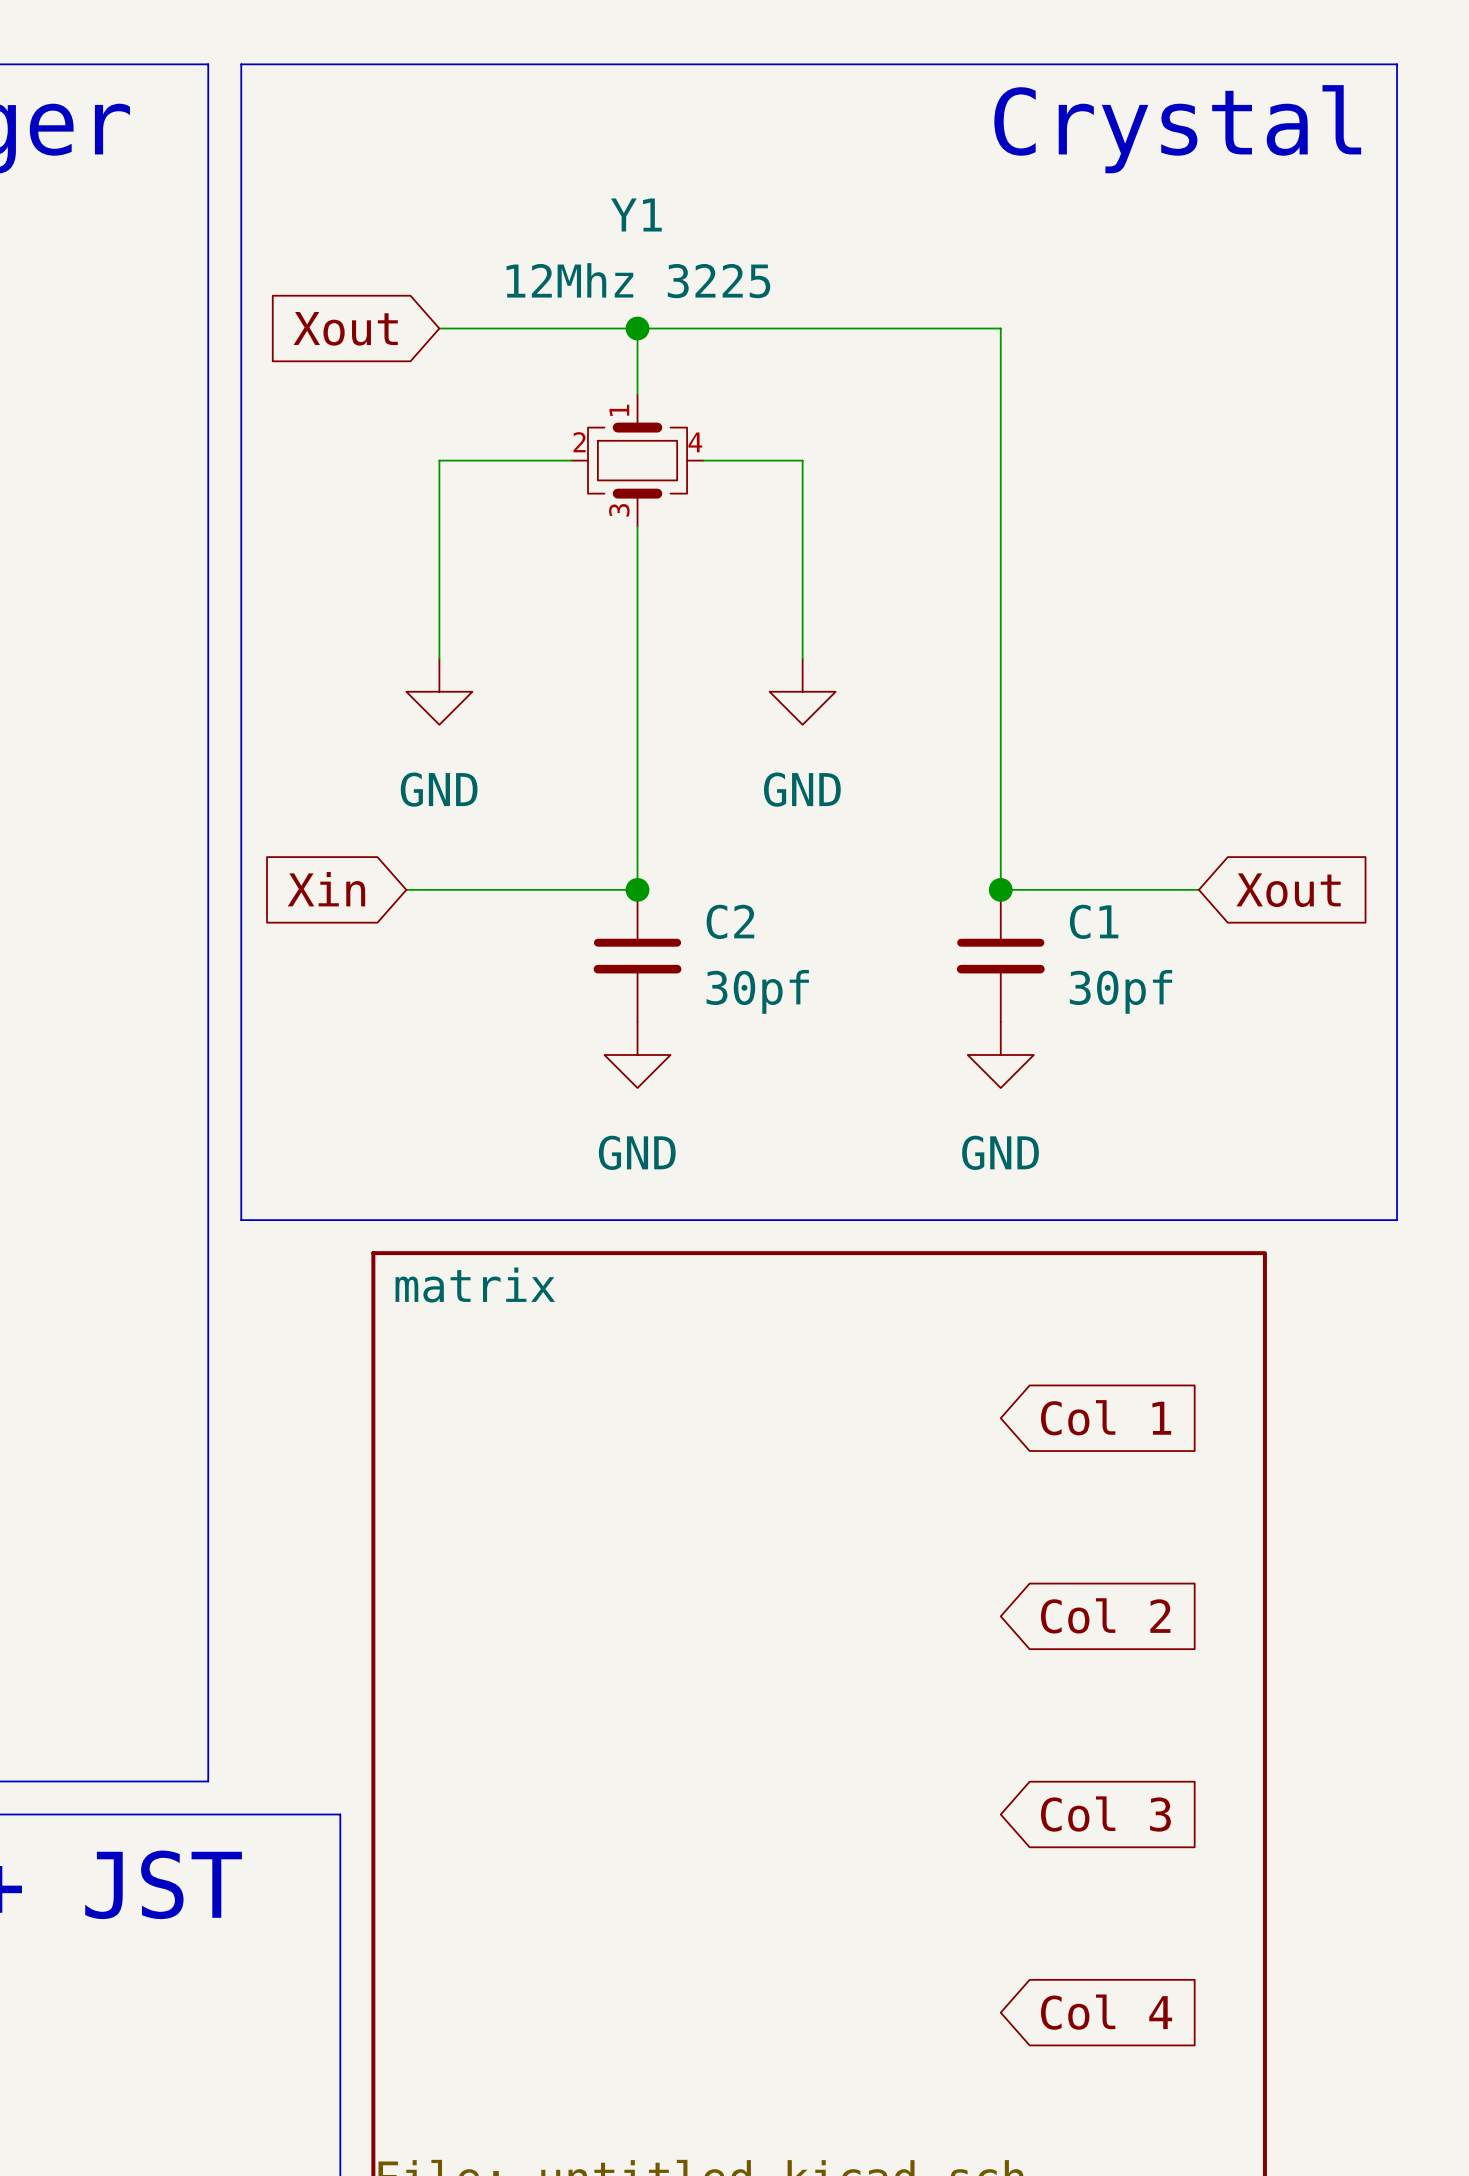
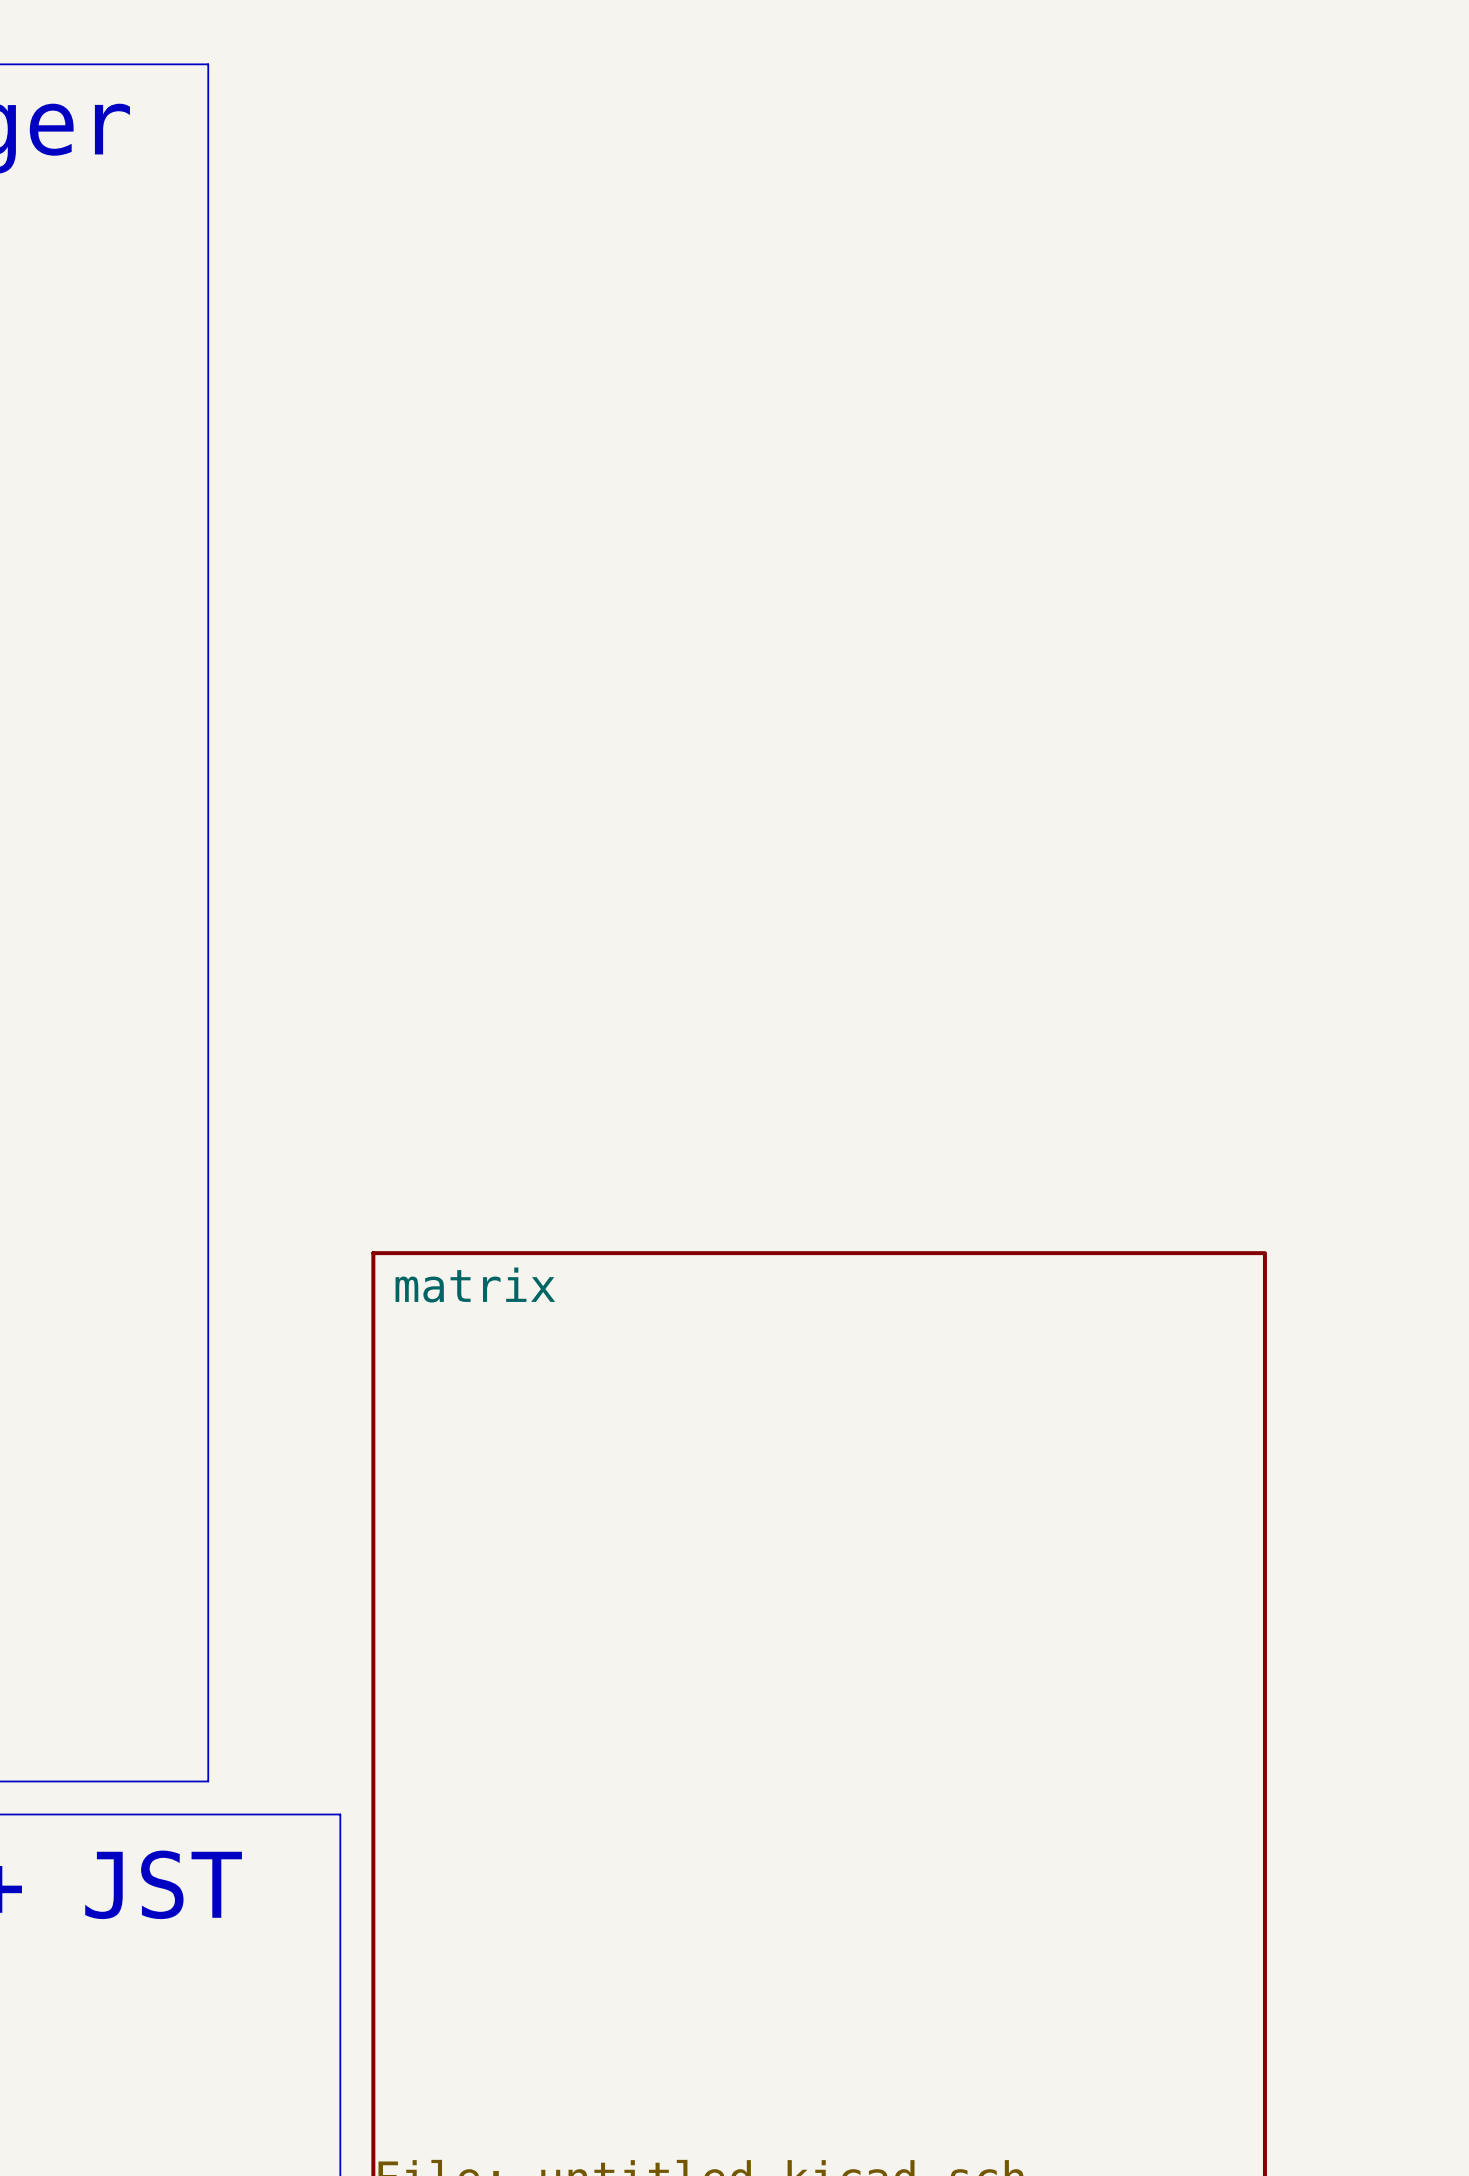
line: (241, 64) (1397, 64) (1397, 1220) (241, 1220) (241, 64) -> none
text: Crystal (1177, 129) -> none
global label: Xout (345, 328) -> none
wire: (439, 328) (1000, 328) (1000, 889) (1198, 889) -> none
wire: (637, 328) (637, 394) -> none
junction: (637, 328) -> none
wire: (571, 460) (439, 460) (439, 658) -> none
Y1: 12Mhz 3225 (637, 460) -> none
wire: (703, 460) (802, 460) (802, 658) -> none
wire: (637, 526) (637, 889) (406, 889) -> none
power symbol: GND (439, 691) -> none
power symbol: GND (802, 691) -> none
global label: Xin (326, 889) -> none
junction: (637, 889) -> none
junction: (1000, 889) -> none
global label: Xout (1288, 890) -> none
C2: 30pf (637, 955) -> none
C1: 30pf (1000, 955) -> none
power symbol: GND (637, 1055) -> none
power symbol: GND (1000, 1055) -> none
global label: Col 1 (1106, 1417) -> none
global label: Col 2 (1105, 1615) -> none
global label: Col 3 (1105, 1814) -> none
global label: Col 4 (1106, 2012) -> none

